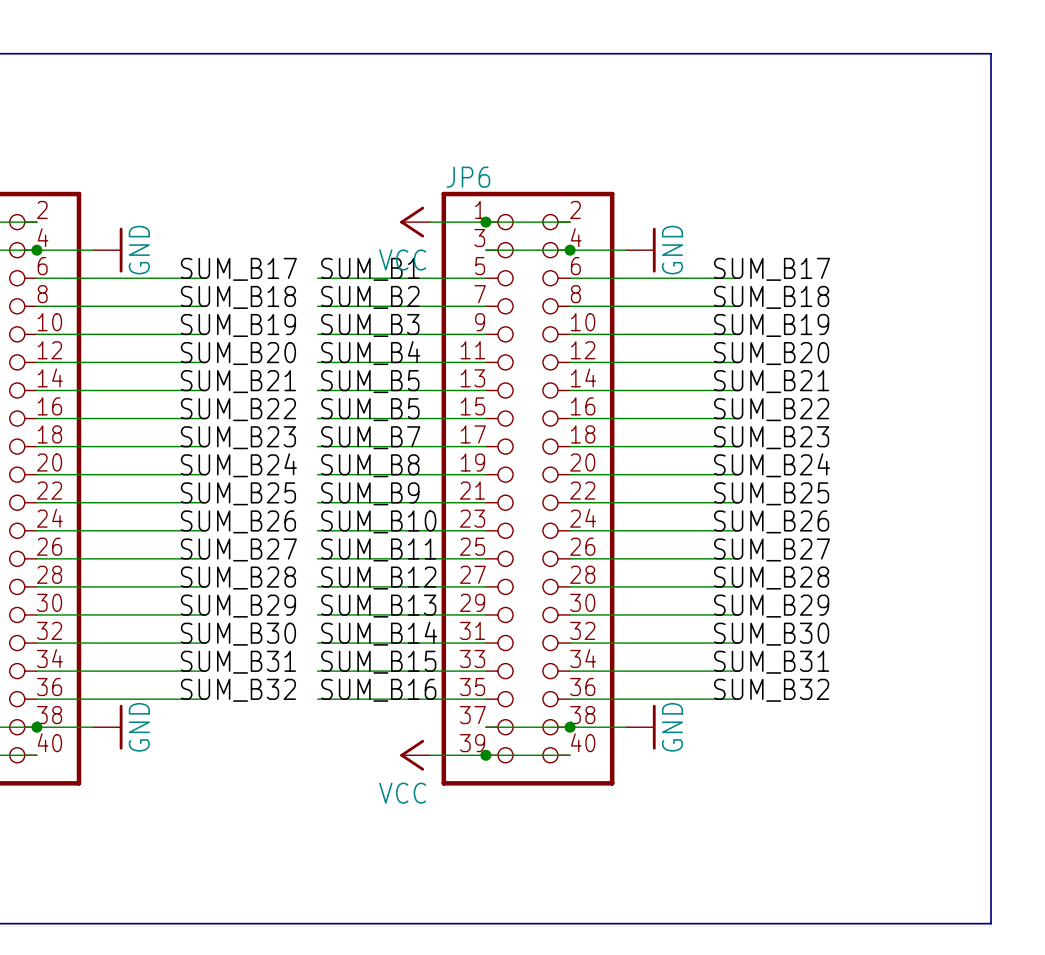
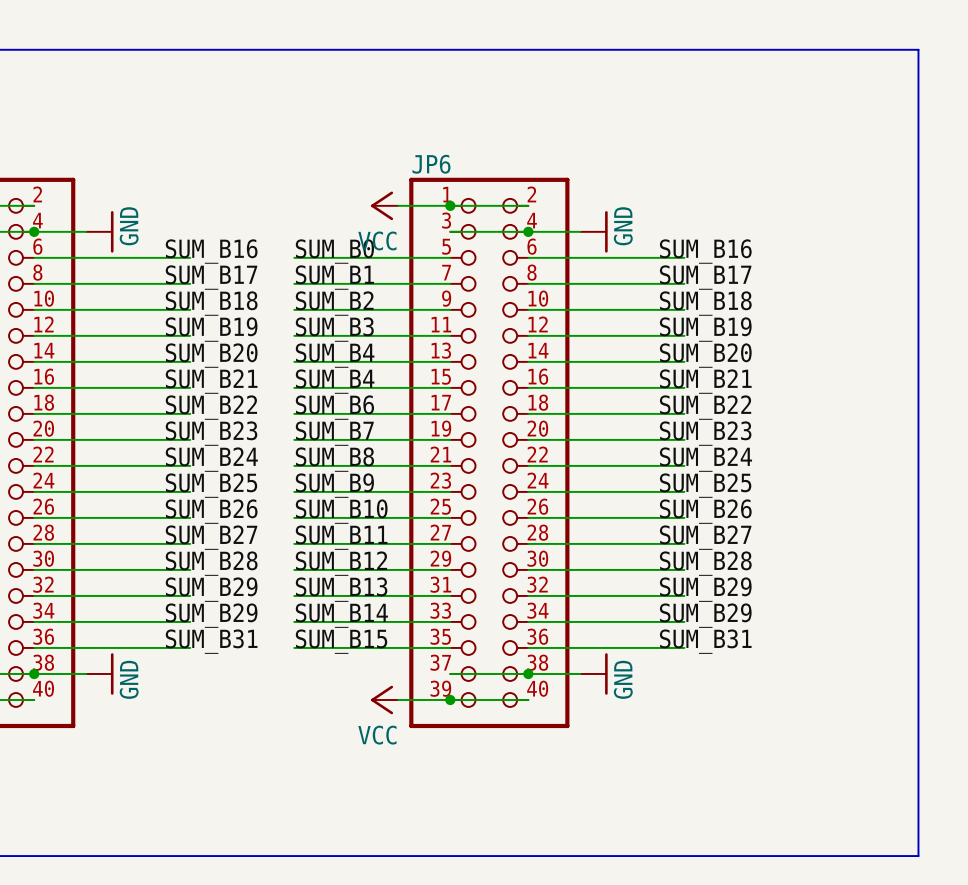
label: SUM_B17 (238, 269) -> SUM_B16 (211, 251)
label: SUM_B1 (370, 269) -> SUM_B0 (334, 251)
label: SUM_B17 (772, 269) -> SUM_B16 (705, 251)
label: SUM_B18 (238, 297) -> SUM_B17 (211, 277)
label: SUM_B2 (370, 297) -> SUM_B1 (334, 277)
label: SUM_B18 (771, 297) -> SUM_B17 (705, 277)
label: SUM_B19 (238, 325) -> SUM_B18 (211, 303)
label: SUM_B3 (370, 325) -> SUM_B2 (334, 303)
label: SUM_B19 (771, 325) -> SUM_B18 (705, 303)
label: SUM_B20 (238, 353) -> SUM_B19 (211, 329)
label: SUM_B4 (370, 353) -> SUM_B3 (334, 329)
label: SUM_B20 (771, 353) -> SUM_B19 (705, 329)
label: SUM_B21 (238, 381) -> SUM_B20 (211, 355)
label: SUM_B5 (370, 381) -> SUM_B4 (335, 355)
label: SUM_B21 (771, 381) -> SUM_B20 (705, 355)
label: SUM_B22 (238, 409) -> SUM_B21 (211, 381)
label: SUM_B5 (370, 409) -> SUM_B4 (335, 381)
label: SUM_B22 (771, 409) -> SUM_B21 (705, 381)
label: SUM_B23 (238, 437) -> SUM_B22 (211, 407)
label: SUM_B7 (370, 437) -> SUM_B6 (334, 407)
label: SUM_B23 (771, 437) -> SUM_B22 (705, 407)
label: SUM_B24 (238, 465) -> SUM_B23 (211, 433)
label: SUM_B8 (370, 465) -> SUM_B7 (334, 433)
label: SUM_B24 (772, 465) -> SUM_B23 (705, 433)
label: SUM_B25 (238, 493) -> SUM_B24 (211, 459)
label: SUM_B9 (370, 493) -> SUM_B8 (334, 459)
label: SUM_B25 (771, 493) -> SUM_B24 (705, 459)
label: SUM_B26 (238, 521) -> SUM_B25 (211, 485)
label: SUM_B10 (378, 521) -> SUM_B9 (334, 485)
label: SUM_B26 (771, 521) -> SUM_B25 (705, 485)
label: SUM_B27 (238, 549) -> SUM_B26 (211, 511)
label: SUM_B11 (378, 549) -> SUM_B10 (341, 511)
label: SUM_B27 (772, 549) -> SUM_B26 (705, 511)
label: SUM_B28 (238, 578) -> SUM_B27 (211, 537)
label: SUM_B12 (378, 578) -> SUM_B11 (341, 537)
label: SUM_B28 (771, 578) -> SUM_B27 (705, 537)
label: SUM_B29 (238, 606) -> SUM_B28 (211, 563)
label: SUM_B13 (378, 606) -> SUM_B12 (341, 563)
label: SUM_B29 (771, 606) -> SUM_B28 (705, 563)
label: SUM_B14 (379, 633) -> SUM_B13 (341, 589)
label: SUM_B30 (238, 634) -> SUM_B29 (211, 589)
label: SUM_B30 (771, 634) -> SUM_B29 (705, 589)
label: SUM_B31 (238, 662) -> SUM_B29 (211, 615)
label: SUM_B15 (378, 662) -> SUM_B14 (341, 615)
label: SUM_B31 (771, 662) -> SUM_B29 (705, 615)
label: SUM_B32 (238, 690) -> SUM_B31 (211, 641)
label: SUM_B16 (378, 690) -> SUM_B15 (341, 641)
label: SUM_B32 (771, 690) -> SUM_B31 (705, 641)

